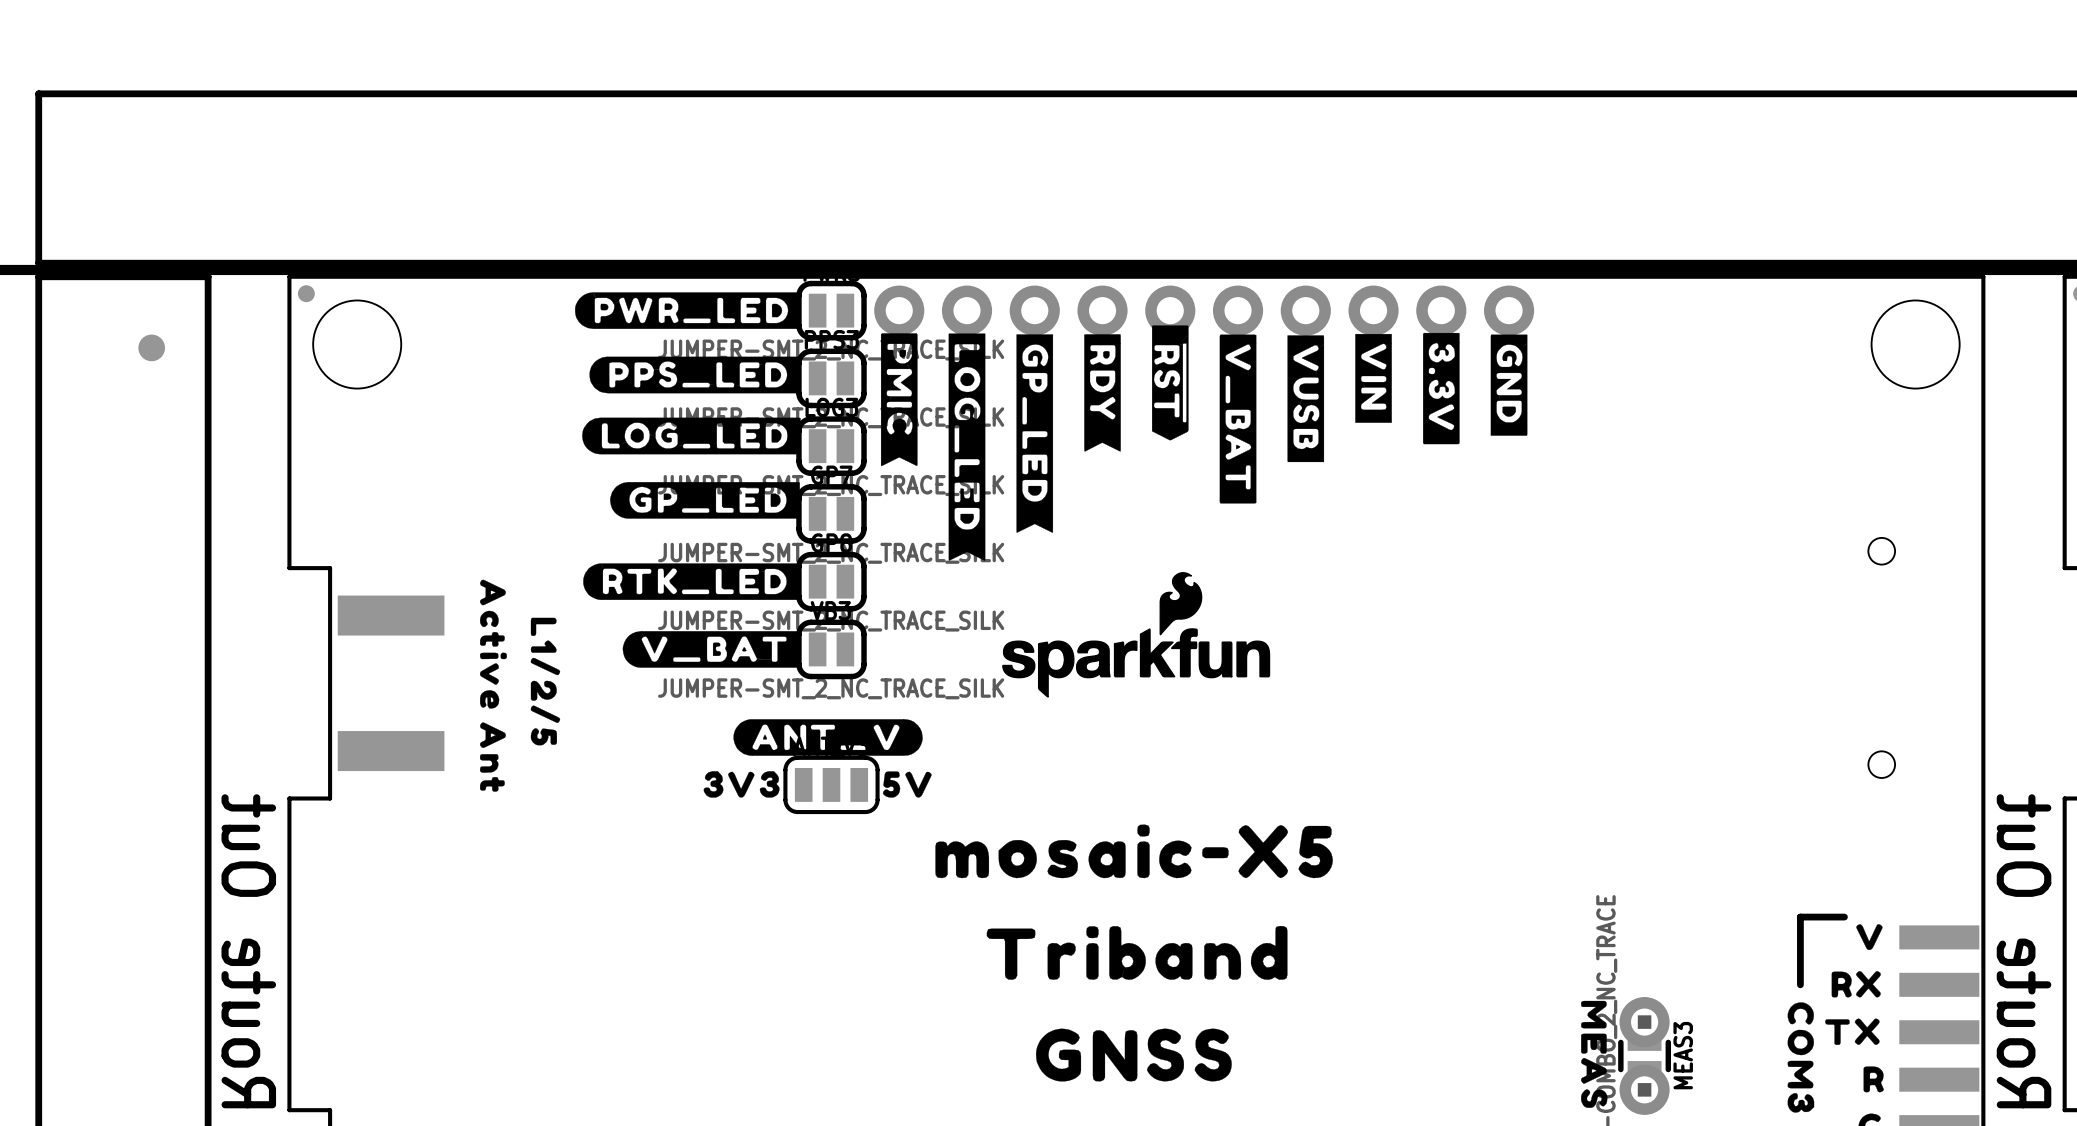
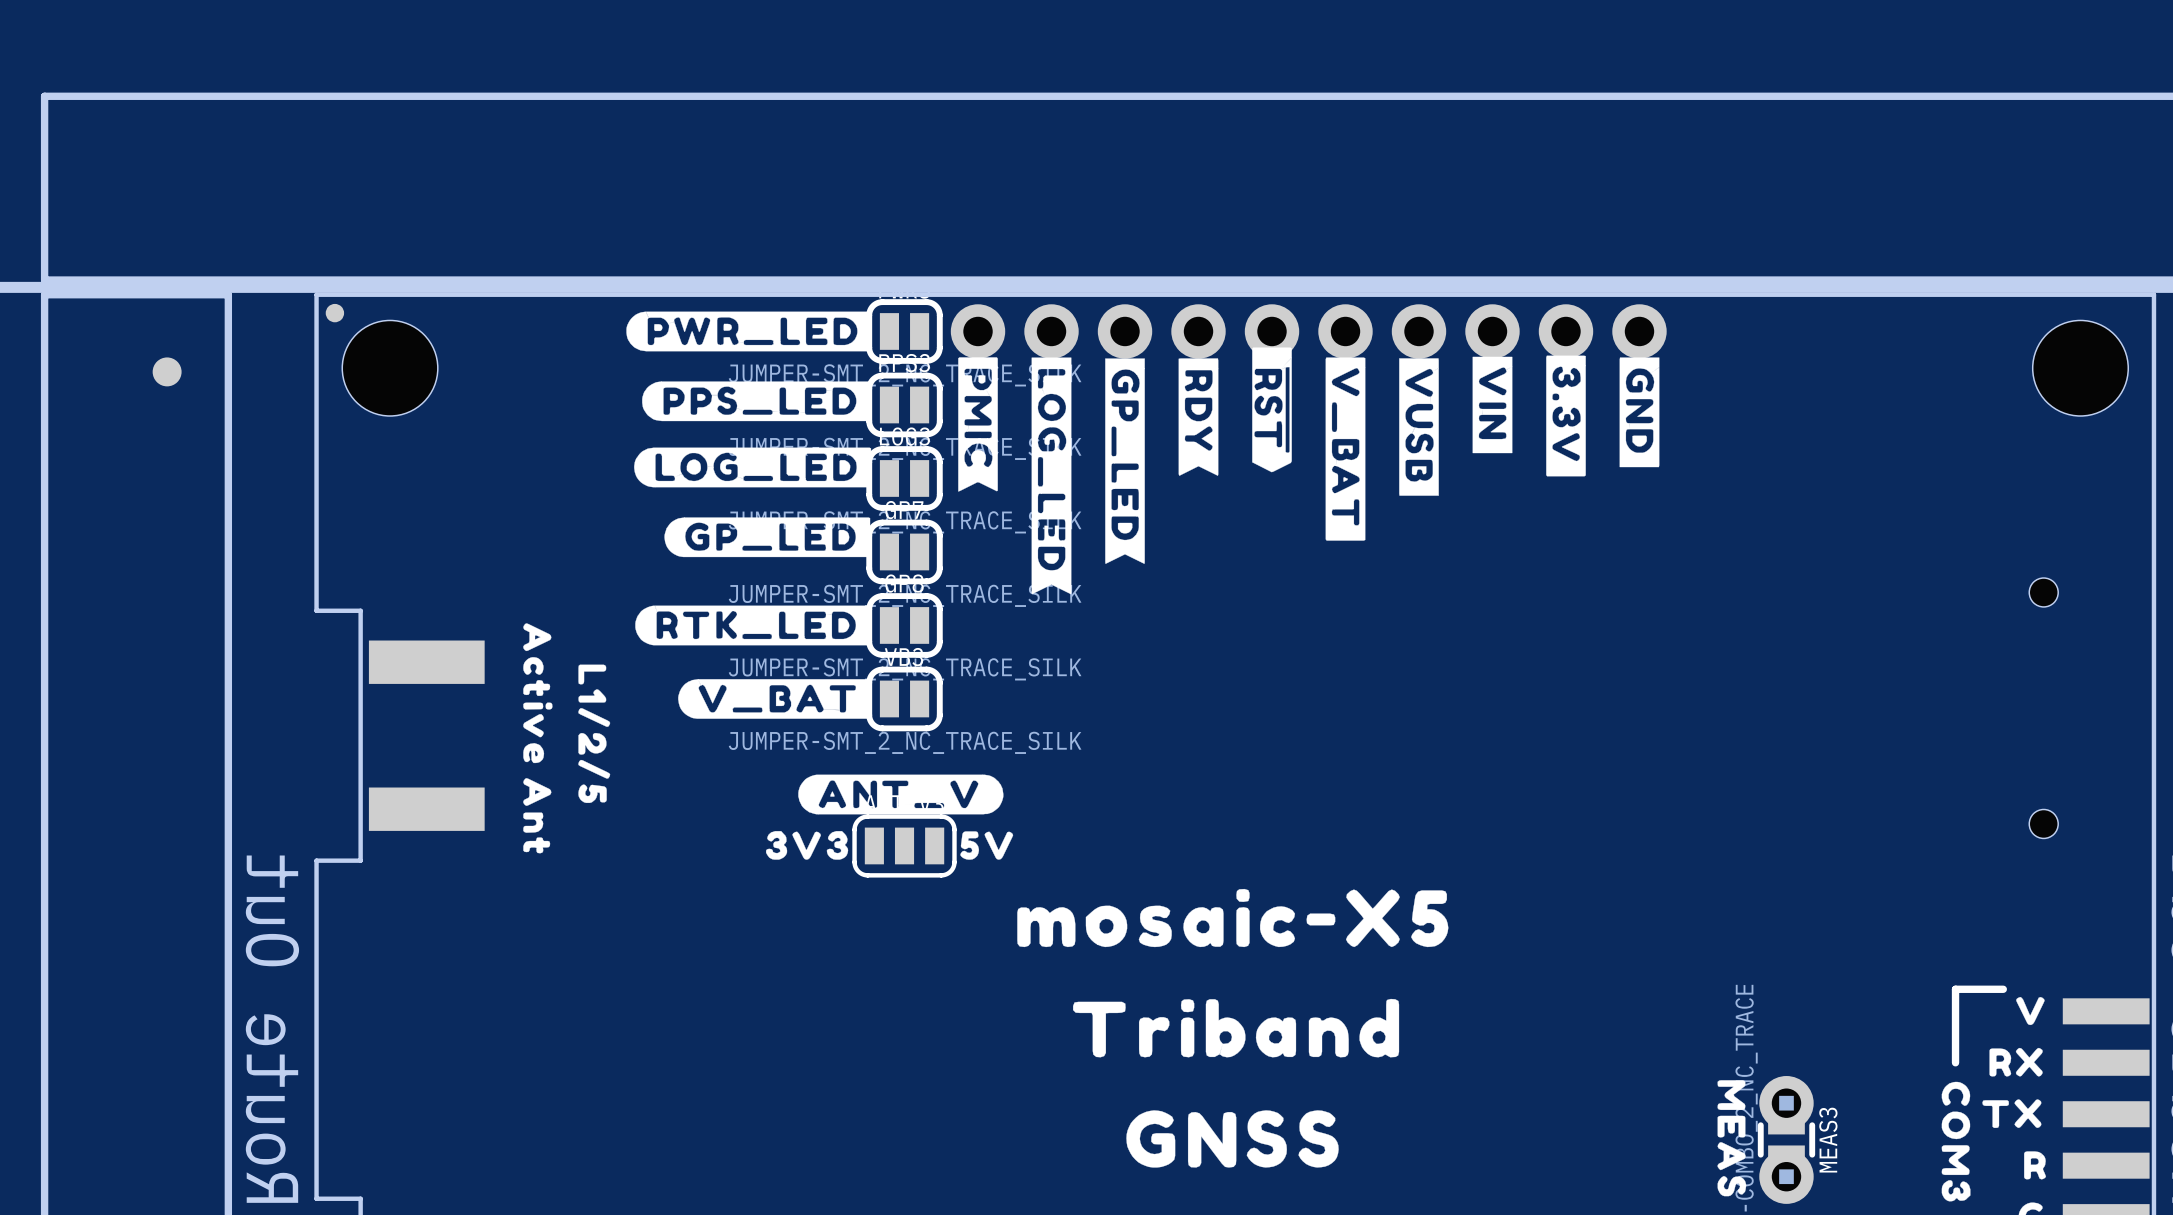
drawing shape: [880, 333, 918, 467] -> [958, 357, 998, 492]
drawing shape: [948, 333, 986, 561] -> [1031, 357, 1072, 595]
drawing shape: [1016, 334, 1054, 533] -> [1105, 358, 1145, 564]
drawing shape: [1084, 334, 1121, 452] -> [1178, 358, 1219, 476]
drawing: [1002, 572, 1271, 698] -> none

